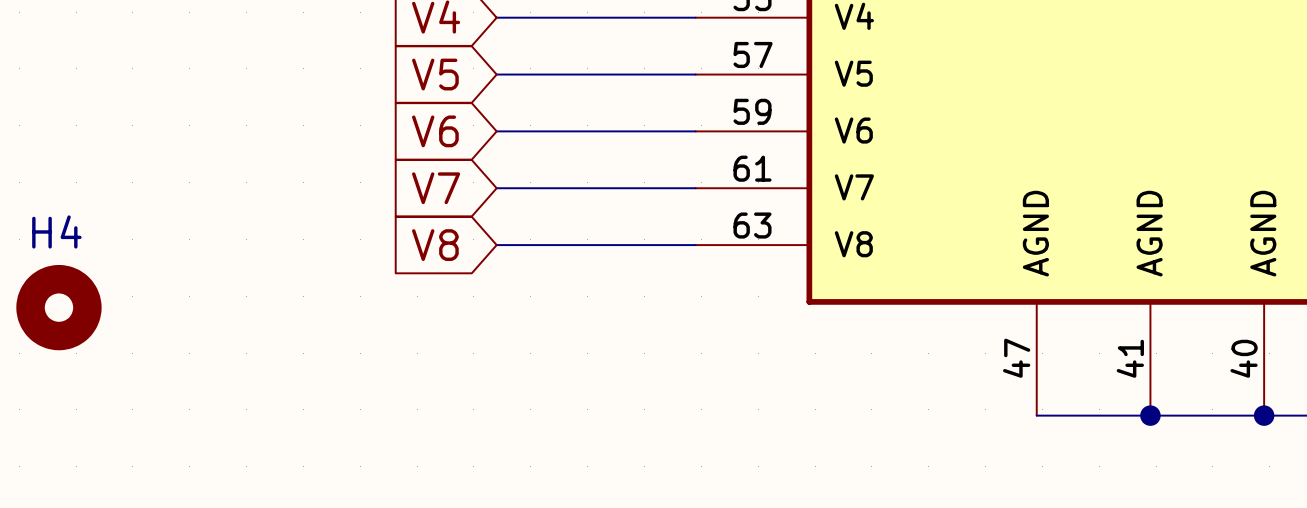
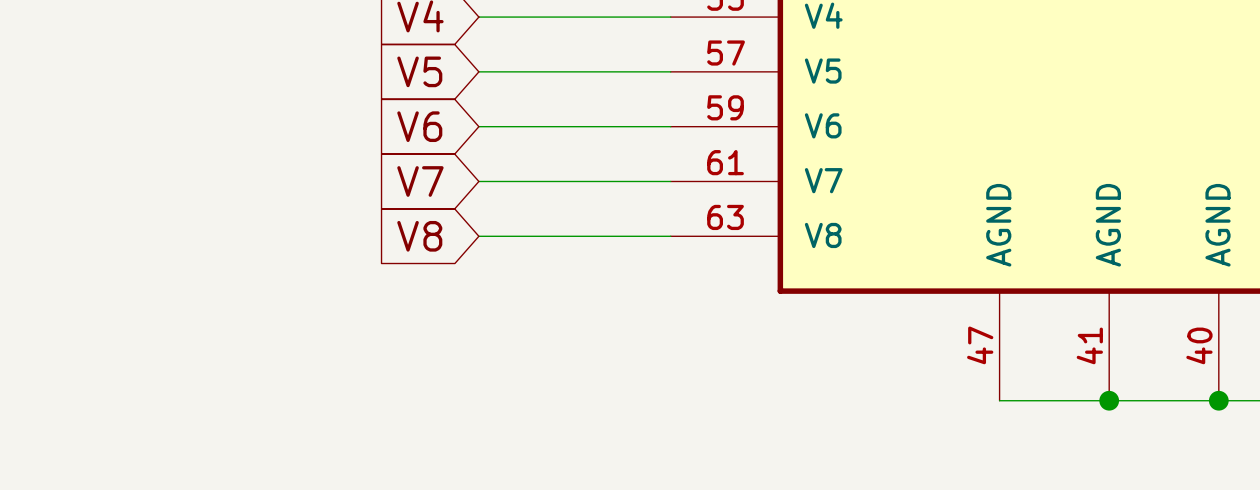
H4: (58, 307) -> none

